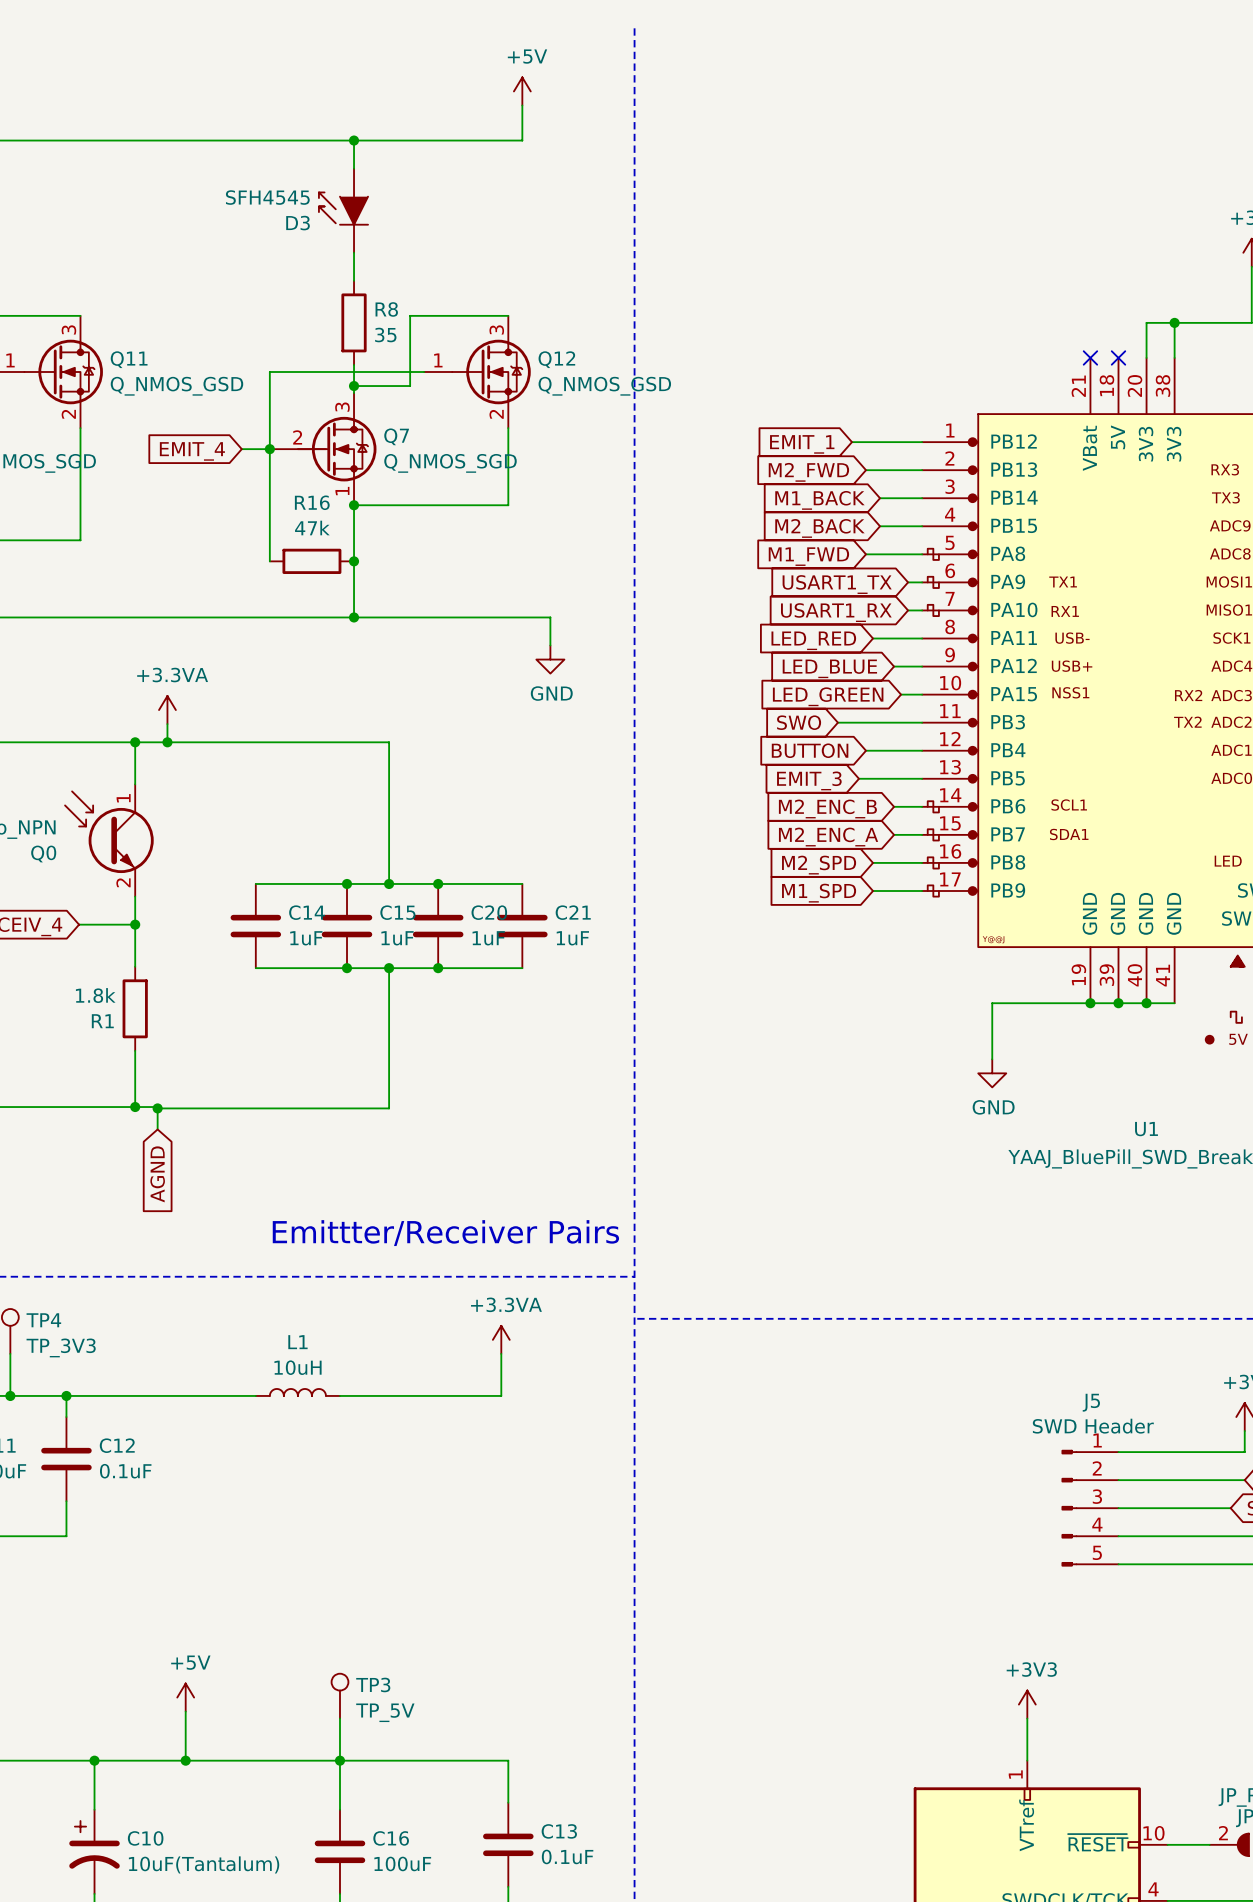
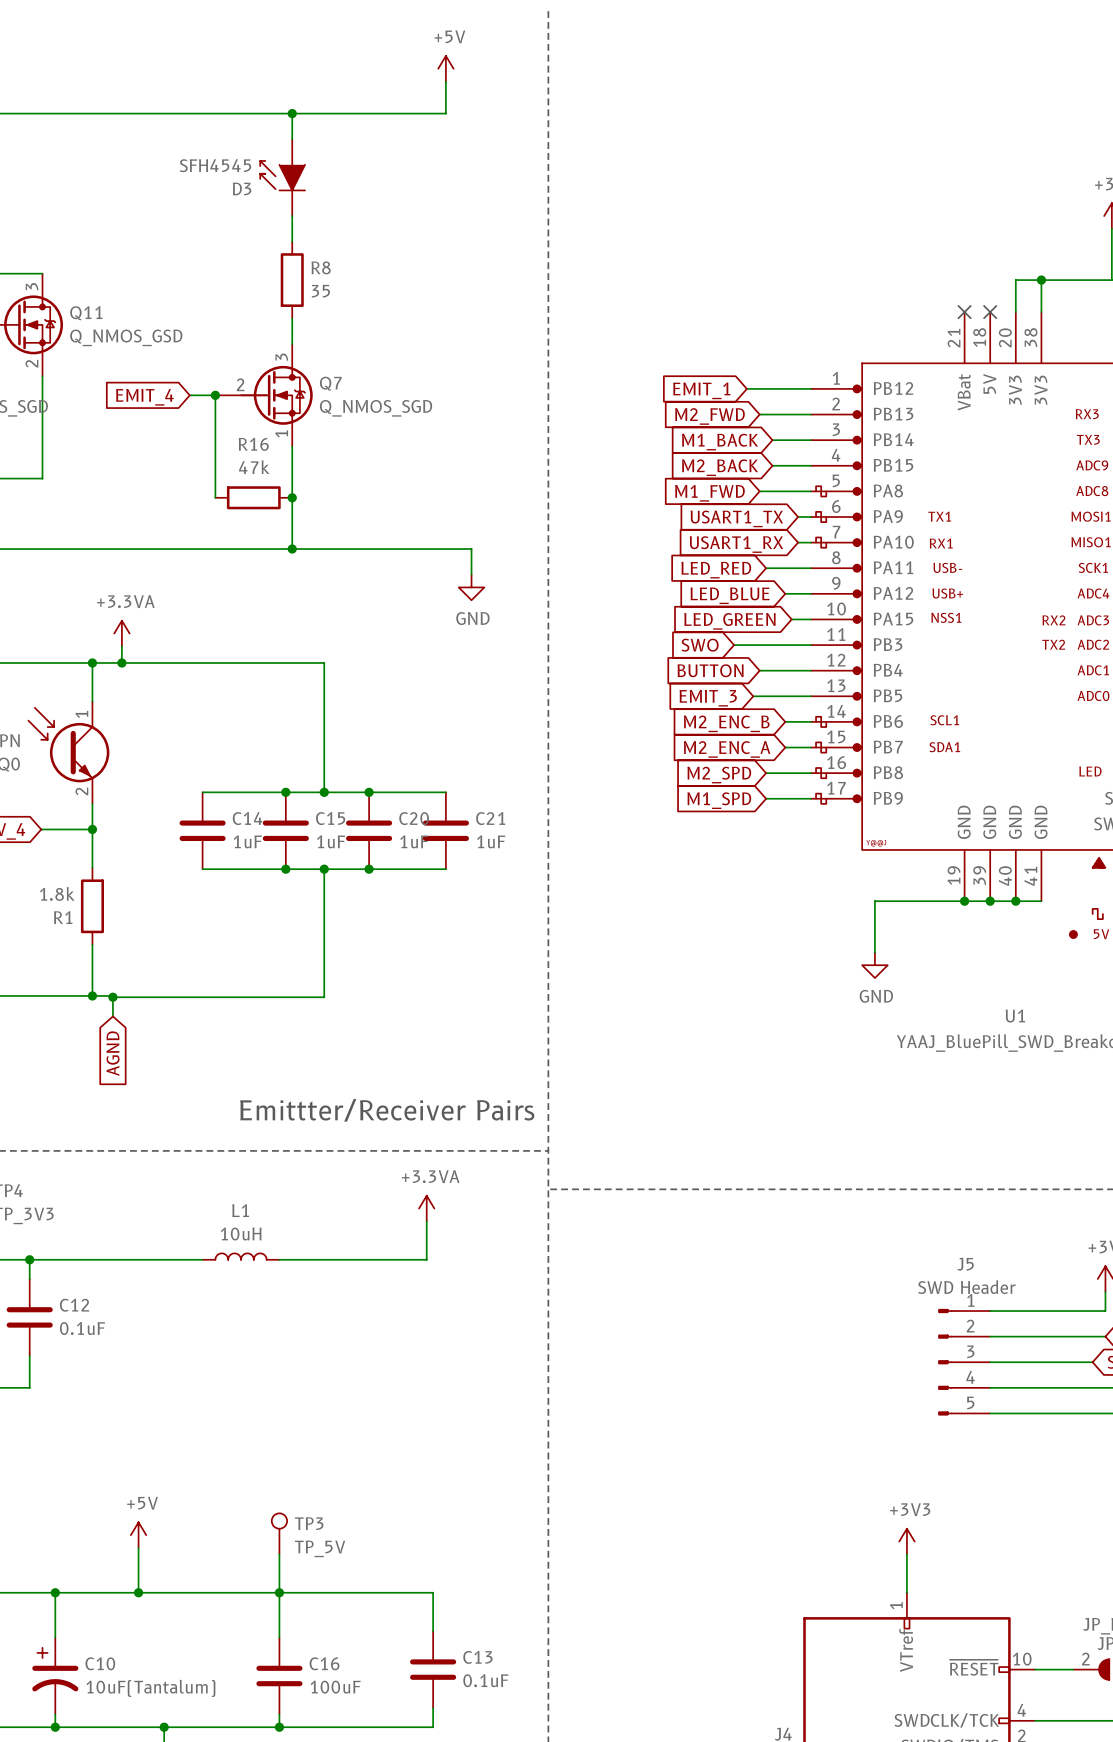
wire: (508, 315) (410, 315) (410, 386) (354, 386) -> none
wire: (424, 371) (269, 371) (269, 449) -> none
Q12: Q_NMOS_GSD (477, 371) -> none
junction: (354, 386) -> none
wire: (508, 428) (508, 505) (354, 505) -> none
junction: (354, 505) -> none

